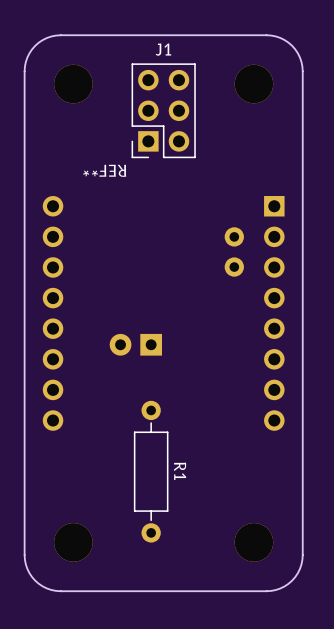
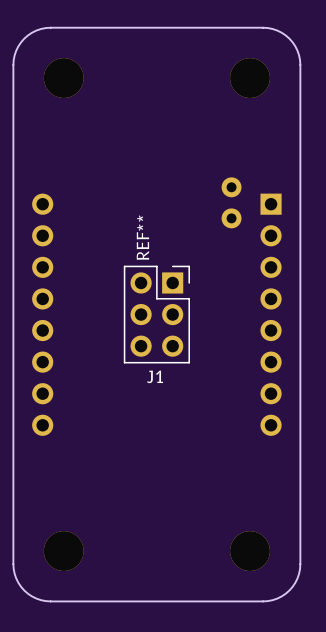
J1 rotation: 0° (163, 110) -> 180° (156, 314)
J1 position: (163, 110) -> (156, 314)
REF** position: (104, 170) -> (142, 237)
REF** name rotation: 0° (104, 170) -> 90° clockwise (142, 237)
part position: (234, 251) -> (231, 202)
part: (135, 344) -> none
R1: (151, 471) -> none

